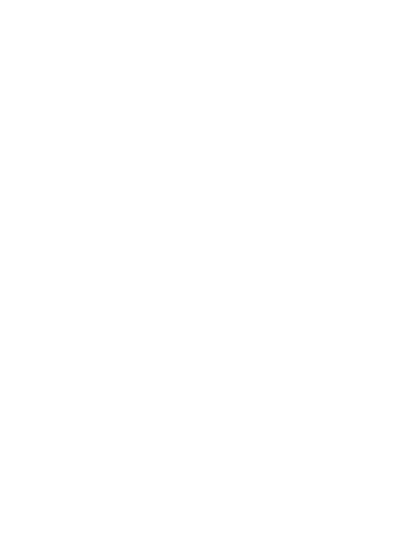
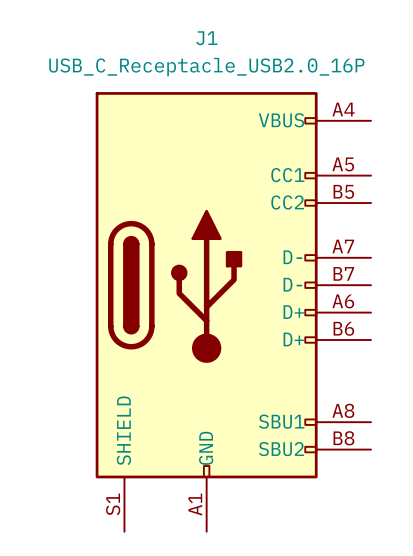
J1: none -> USB_C_Receptacle_USB2.0_16P (233, 311)

